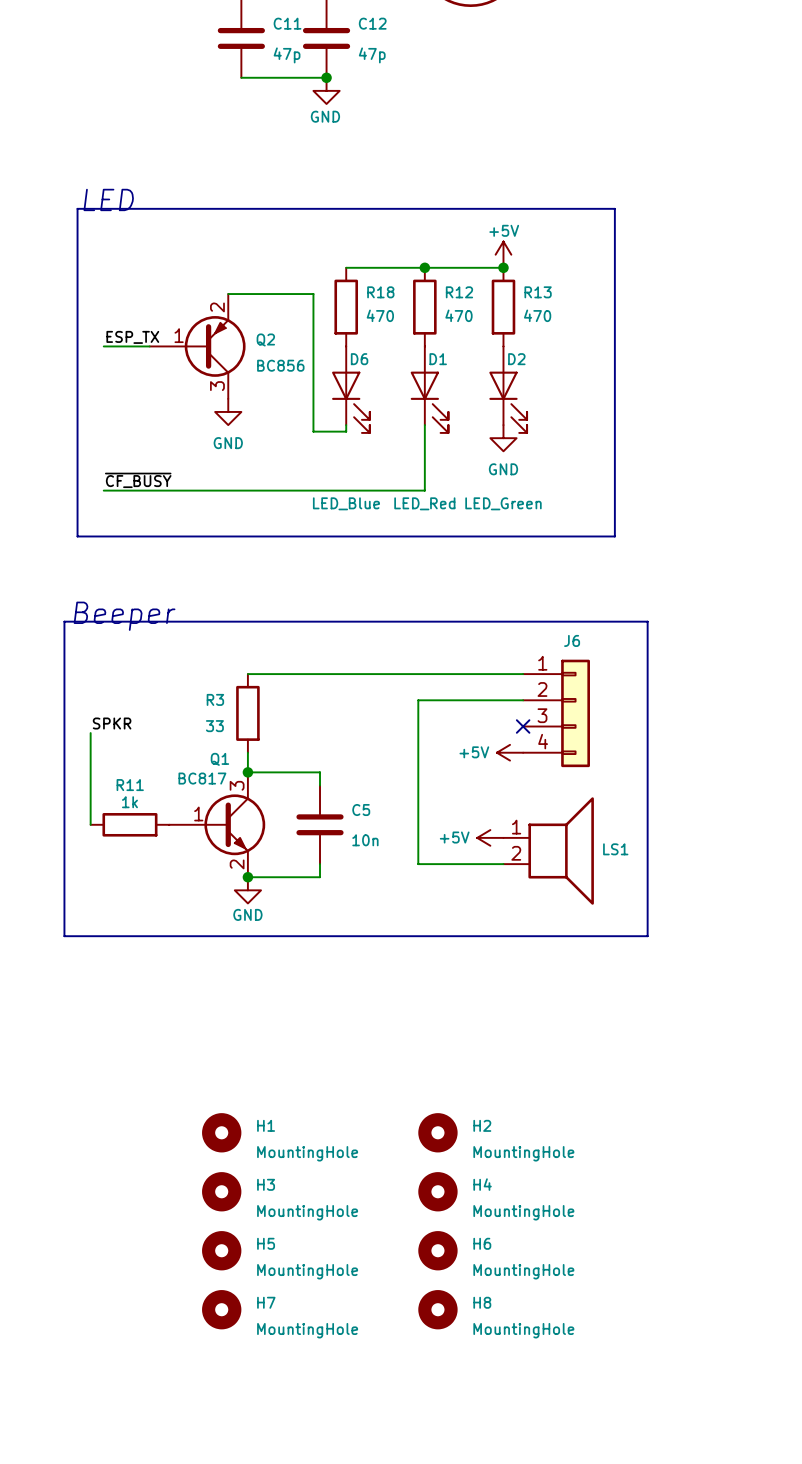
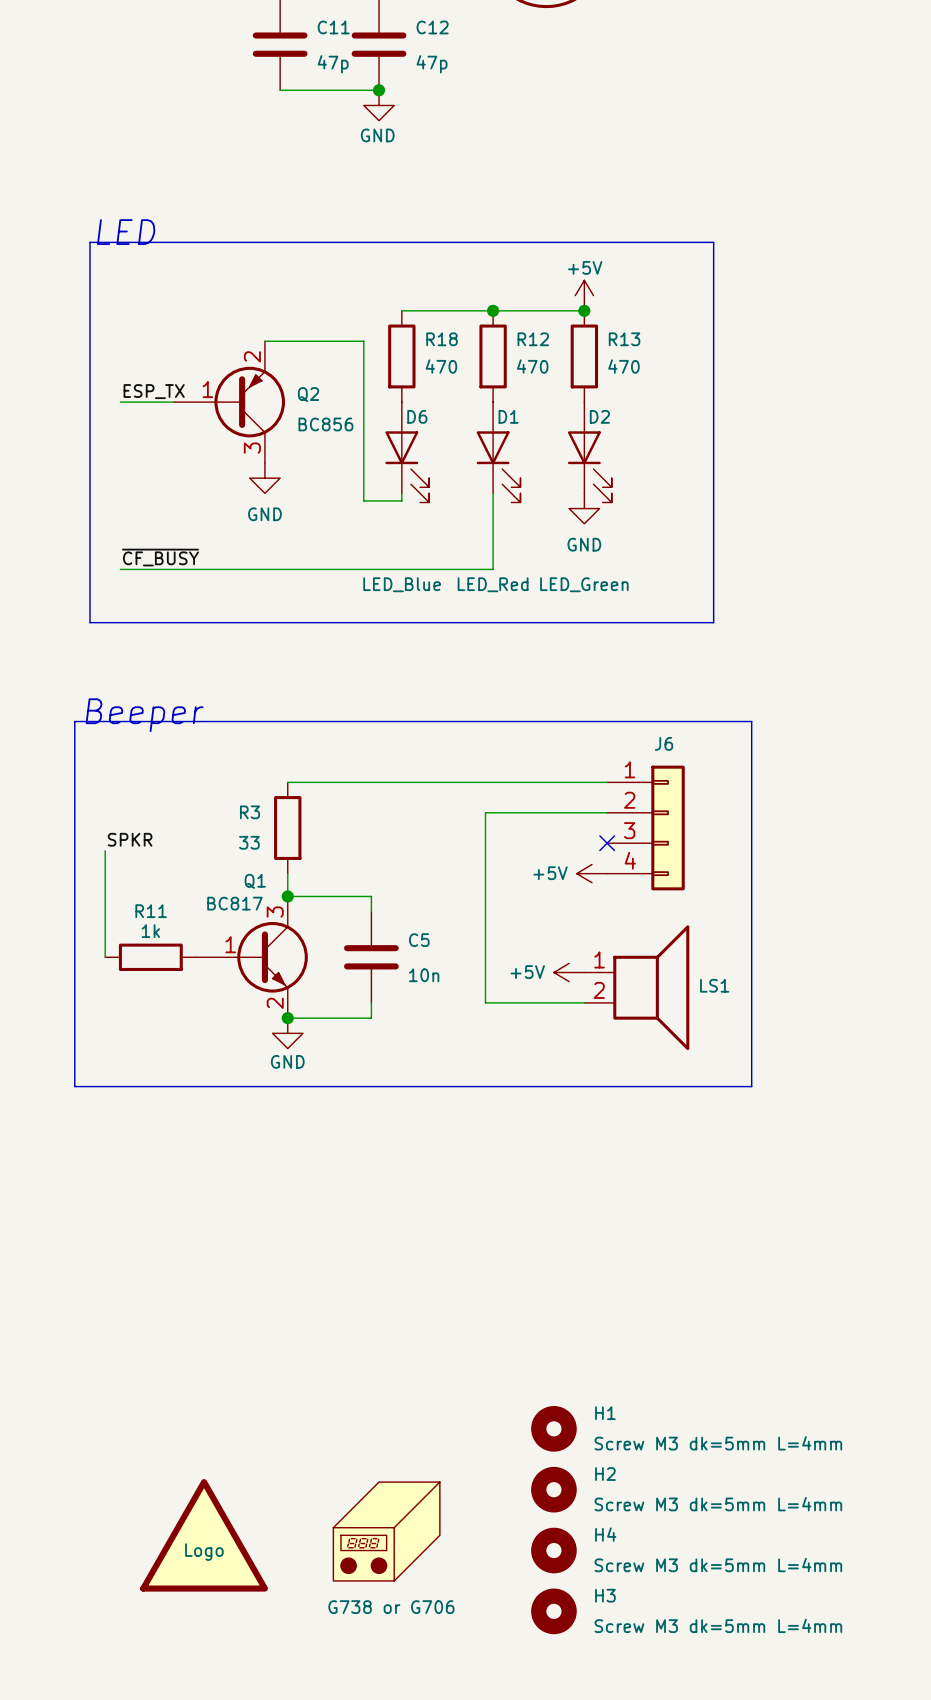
H1 name position: H1 (266, 1125) -> H1 (605, 1413)
H2 name position: H2 (482, 1125) -> H2 (605, 1474)
H1 position: (221, 1132) -> (553, 1428)
H2 position: (437, 1132) -> (553, 1489)
H1 value: MountingHole (307, 1153) -> Screw M3 dk=5mm L=4mm (718, 1443)
H2 value: MountingHole (523, 1153) -> Screw M3 dk=5mm L=4mm (718, 1504)
H3 name position: H3 (266, 1184) -> H3 (605, 1595)
H4 name position: H4 (482, 1184) -> H4 (605, 1534)
H3 position: (221, 1191) -> (553, 1611)
H4 position: (437, 1191) -> (553, 1550)
H3 value: MountingHole (307, 1212) -> Screw M3 dk=5mm L=4mm (718, 1625)
H4 value: MountingHole (523, 1212) -> Screw M3 dk=5mm L=4mm (718, 1565)
H5: MountingHole (221, 1250) -> none
H6: MountingHole (437, 1250) -> none
H7: MountingHole (221, 1309) -> none
H8: MountingHole (437, 1309) -> none
part: none -> G738 or G706 (386, 1531)
part: none -> (204, 1535)

